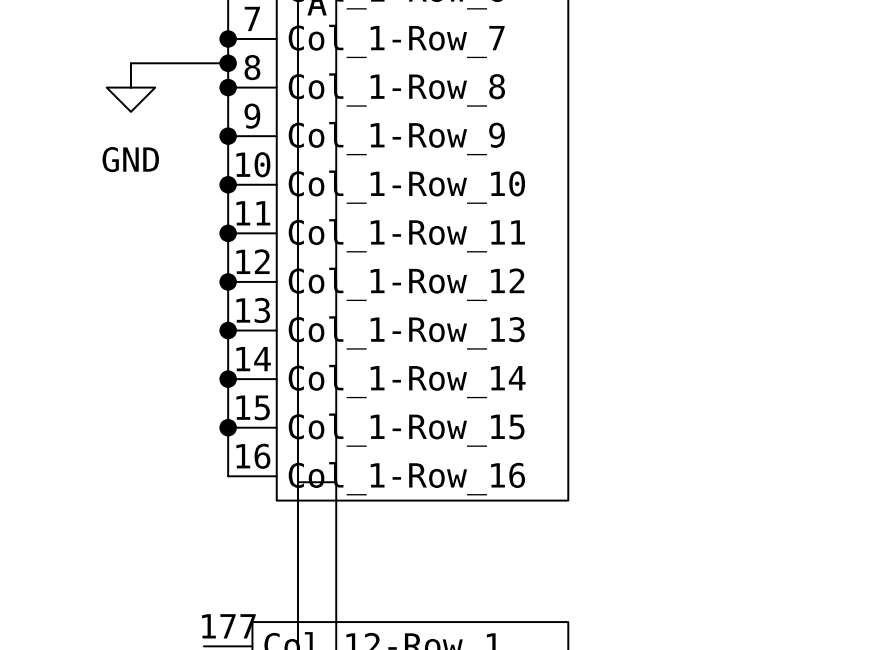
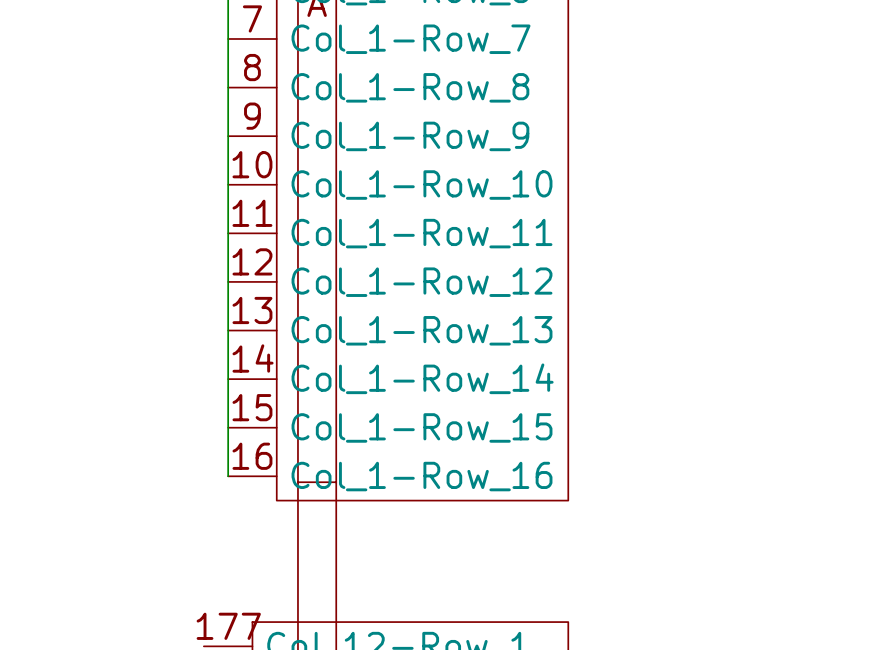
junction: (228, 38) -> none
wire: (130, 63) (228, 63) -> none
junction: (228, 63) -> none
power symbol: GND (130, 87) -> none
junction: (228, 87) -> none
junction: (228, 136) -> none
junction: (228, 184) -> none
junction: (228, 233) -> none
junction: (228, 281) -> none
junction: (228, 330) -> none
junction: (228, 379) -> none
junction: (228, 427) -> none

